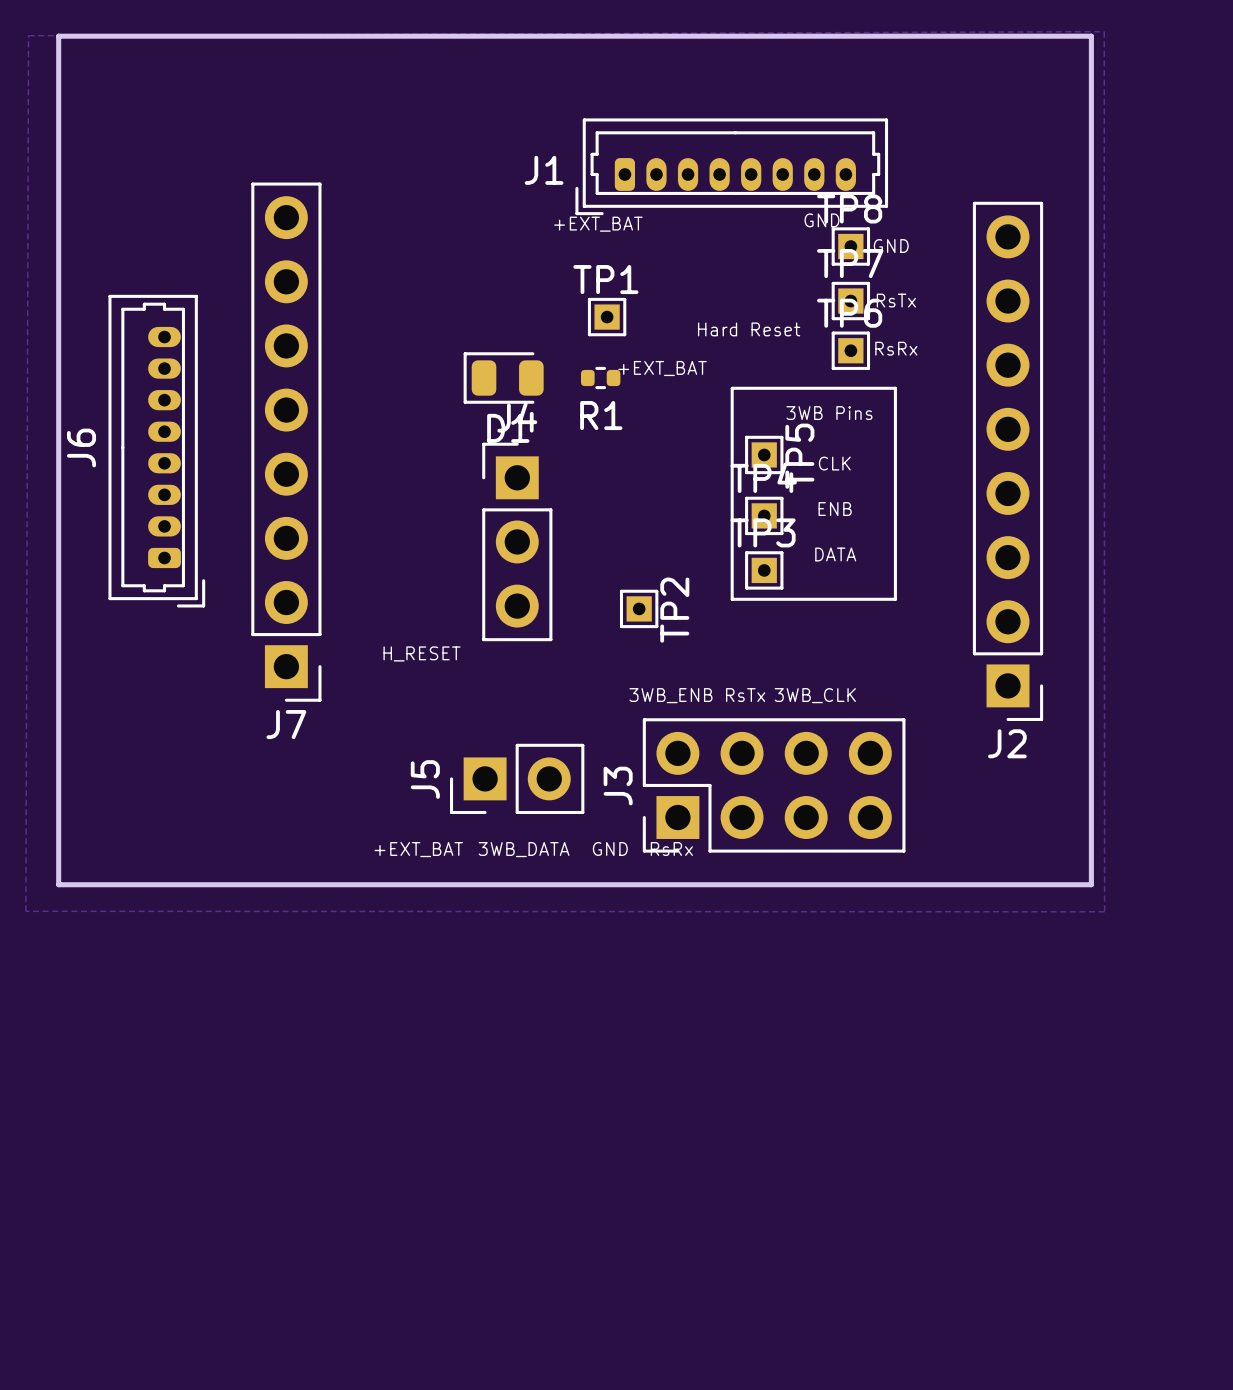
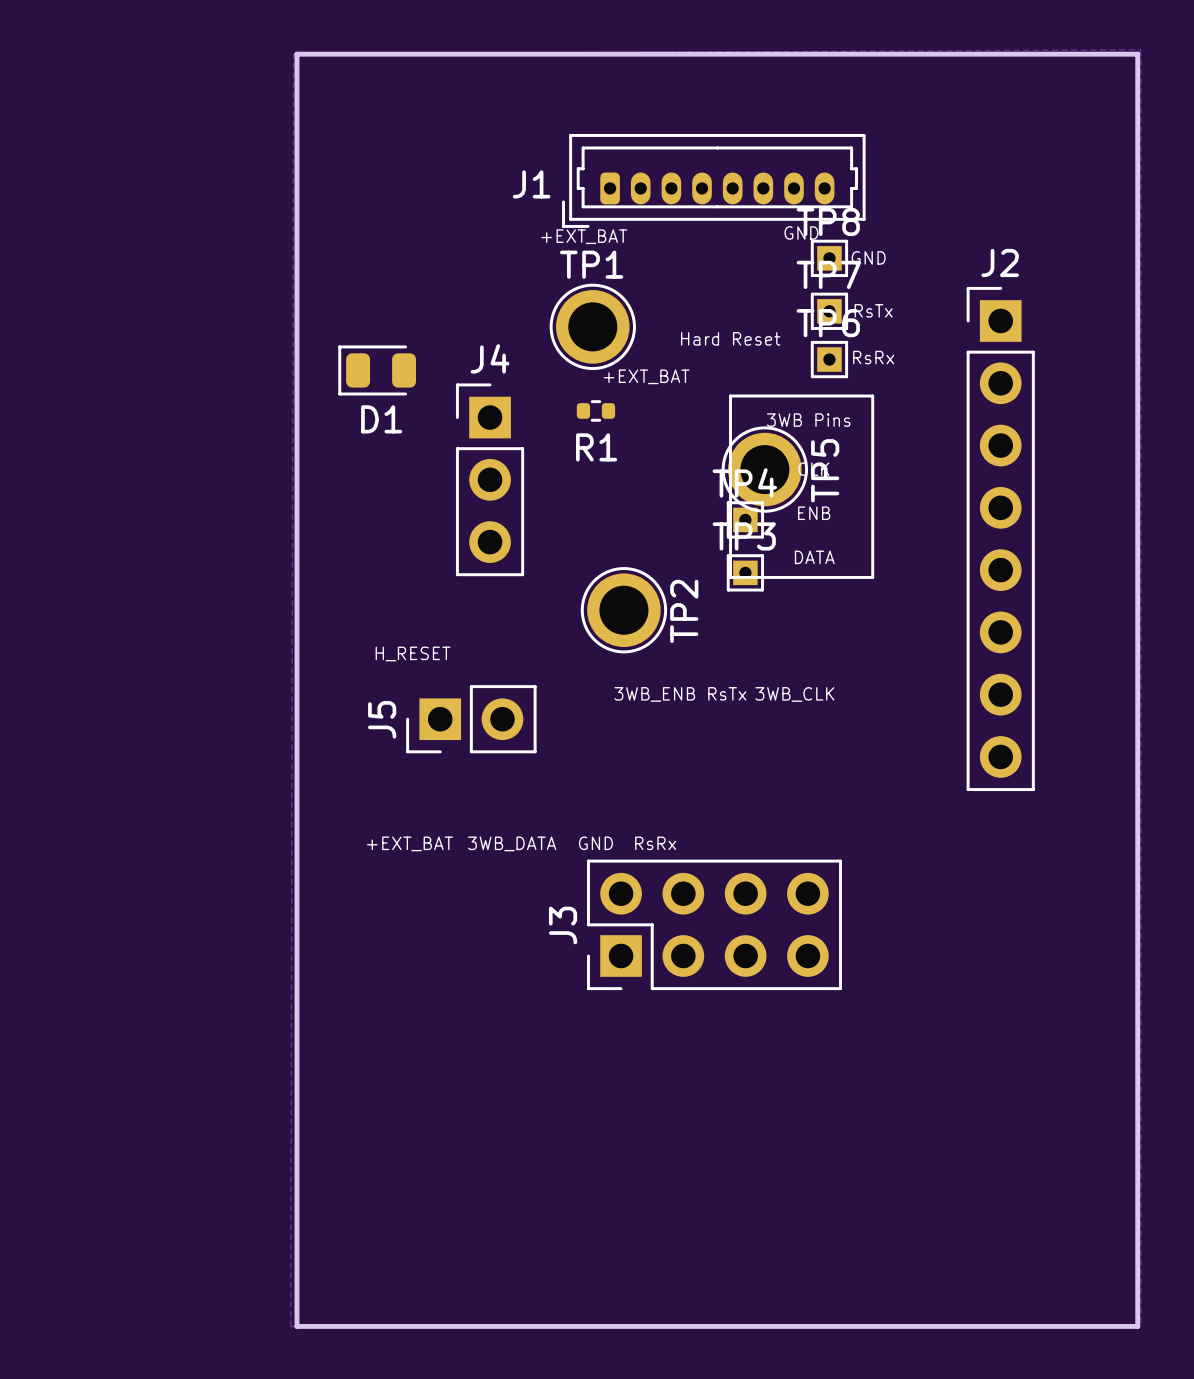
zone outline: (1104, 31) (28, 35) (25, 911) (1104, 911) (1104, 31) -> (1140, 49) (293, 54) (290, 1326) (1140, 1326) (1140, 49)
board edge: (302, 36) (58, 36) (58, 884) (1091, 884) (1091, 36) -> (296, 54) (296, 1326) (1137, 1326) (1137, 54) (1063, 54)
TP1 footprint: [587, 297, 627, 337] -> [549, 283, 636, 371]
D1 position: (503, 378) -> (377, 370)
R1 position: (600, 378) -> (595, 410)
line: (748, 388) (732, 388) (732, 599) (895, 599) (895, 575) -> (730, 396) (730, 577) (872, 577)
TP5 footprint: [745, 435, 784, 475] -> [721, 426, 809, 513]
J7: (286, 442) -> none
J6: (156, 451) -> none
J2 rotation: 0° (1008, 461) -> 180° (1000, 538)
J4 position: (517, 541) -> (490, 479)
TP2 footprint: [619, 589, 659, 629] -> [580, 567, 668, 654]
J5 position: (517, 778) -> (471, 719)
J3 position: (774, 785) -> (714, 924)

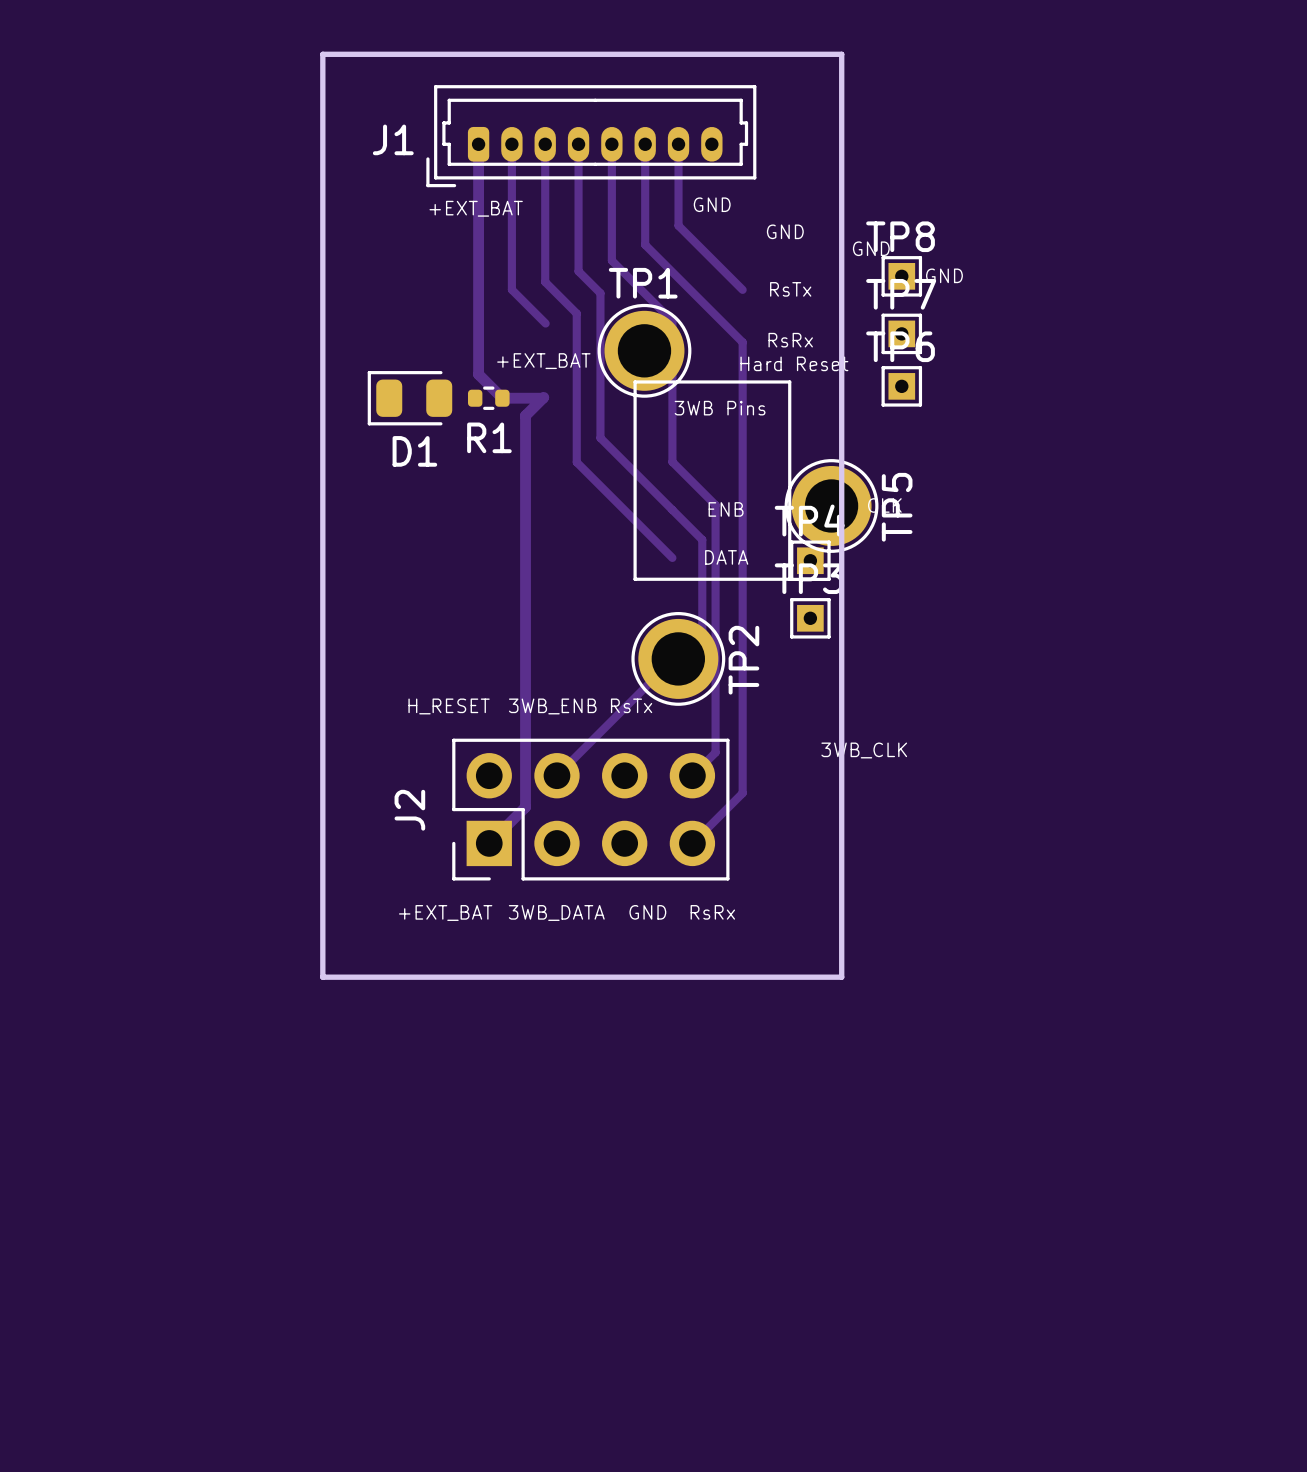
zone outline: (1140, 49) (293, 54) (290, 1326) (1140, 1326) (1140, 49) -> none
board edge: (774, 54) (1137, 54) (1137, 1326) (296, 1326) (296, 902) -> (841, 54) (841, 977) (322, 977)
track: none -> (478, 144) (478, 374) (502, 398) (543, 398)
track: none -> (511, 144) (511, 289) (545, 323)
track: none -> (545, 144) (545, 282) (576, 313) (576, 462) (672, 557)
track: none -> (578, 144) (578, 271) (600, 293) (600, 438) (702, 539) (702, 630) (556, 775)
track: none -> (611, 144) (611, 260) (672, 321) (672, 461) (715, 505) (715, 752) (692, 775)
track: none -> (645, 144) (645, 244) (742, 342) (742, 793) (692, 843)
track: none -> (678, 144) (678, 225) (742, 289)
J1 position: (713, 180) -> (591, 136)
text: none -> GND (712, 204)
text: none -> +EXT_BAT (476, 208)
text: none -> GND (785, 231)
text: +EXT_BAT (584, 236) -> none
J2 name position: J2 (1000, 262) -> J2 (409, 810)
J2 footprint: [966, 286, 1035, 792] -> [452, 738, 730, 881]
text position: RsTx (873, 310) -> RsTx (790, 289)
text: none -> +EXT_BAT (543, 361)
text position: RsRx (873, 357) -> RsRx (790, 340)
track: none -> (543, 397) (525, 415) (525, 807) (489, 843)
text: +EXT_BAT (646, 376) -> none
line: (730, 396) (872, 396) (872, 577) (730, 577) (730, 396) -> (635, 381) (789, 381) (789, 579) (635, 579) (635, 381)
R1 position: (595, 410) -> (488, 398)
text position: 3WB Pins (808, 420) -> 3WB Pins (720, 408)
J4: (490, 479) -> none
text position: ENB (814, 513) -> ENB (726, 509)
text position: DATA (814, 557) -> DATA (726, 557)
text position: RsTx (727, 693) -> RsTx (631, 705)
text position: 3WB_ENB (654, 694) -> 3WB_ENB (552, 706)
J5: (471, 719) -> none
J3: (714, 924) -> none

